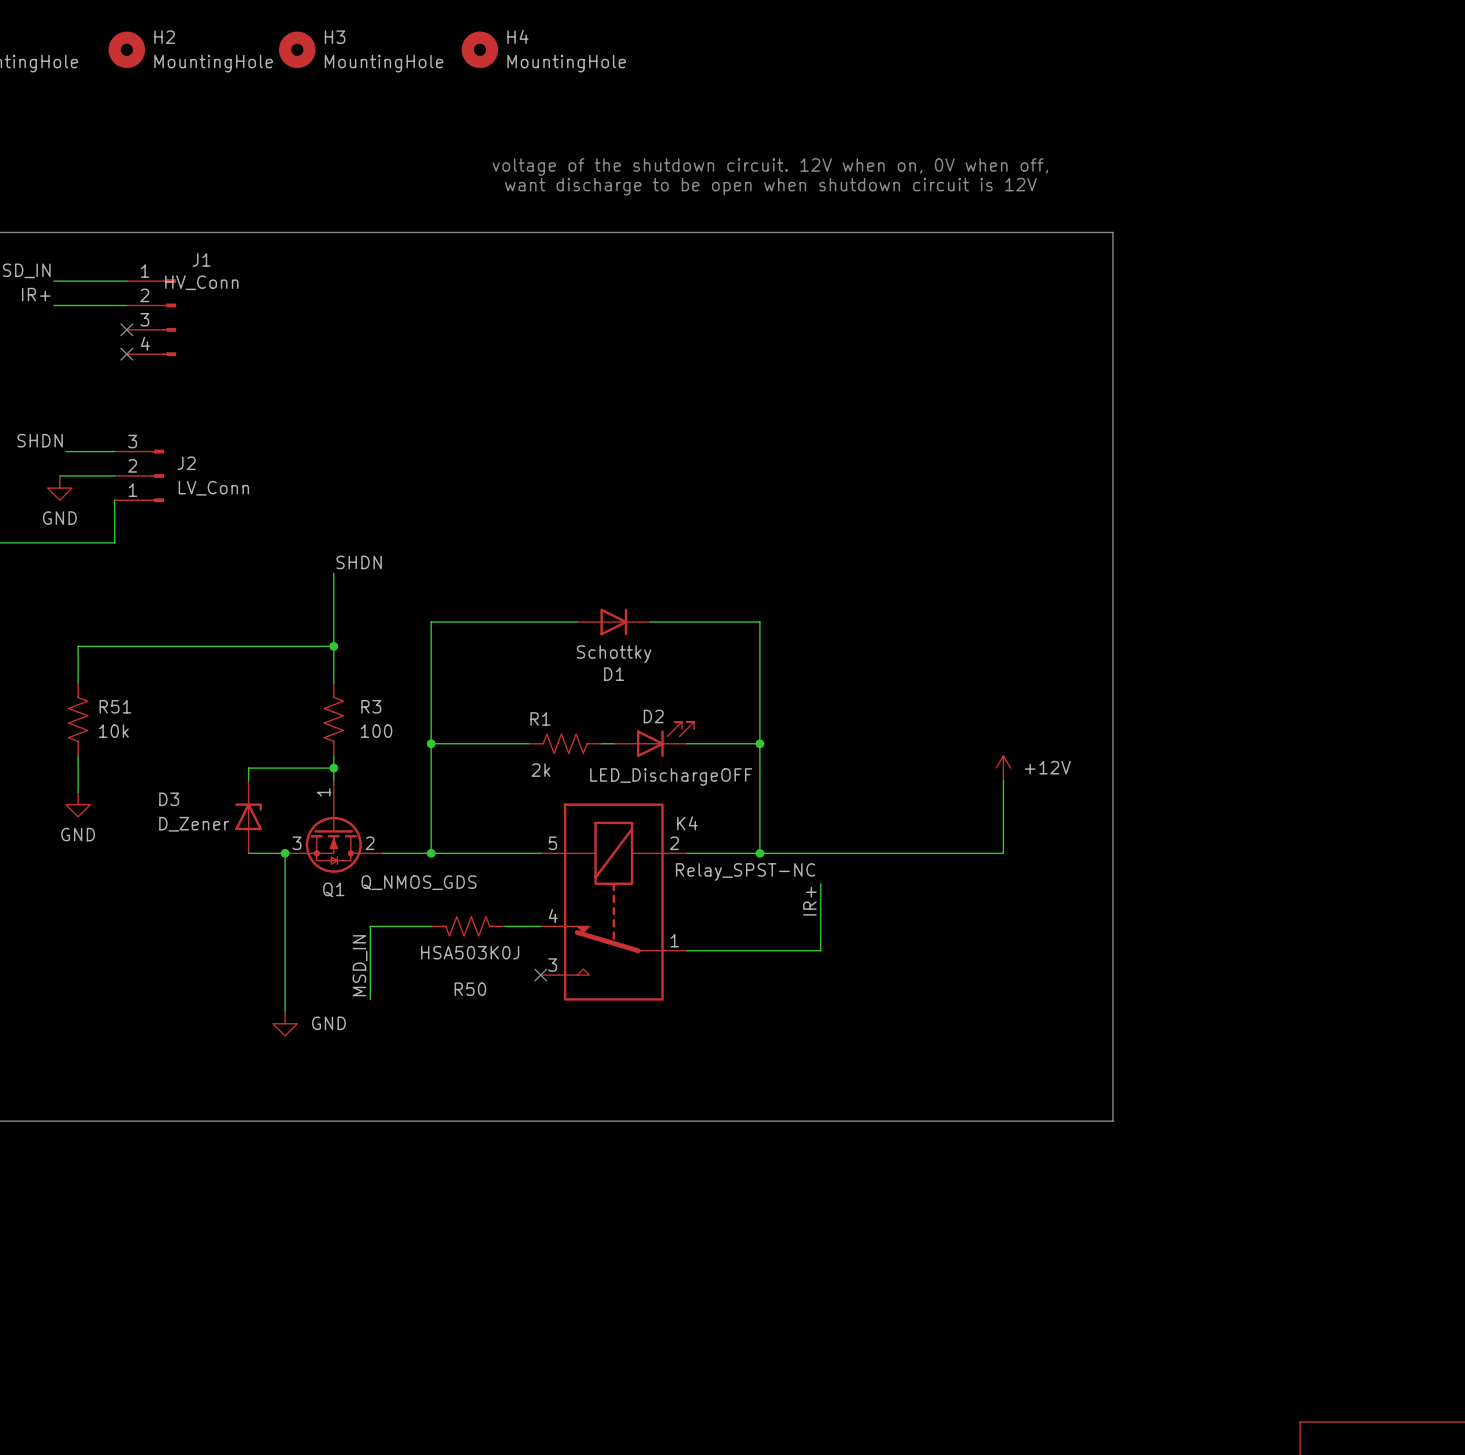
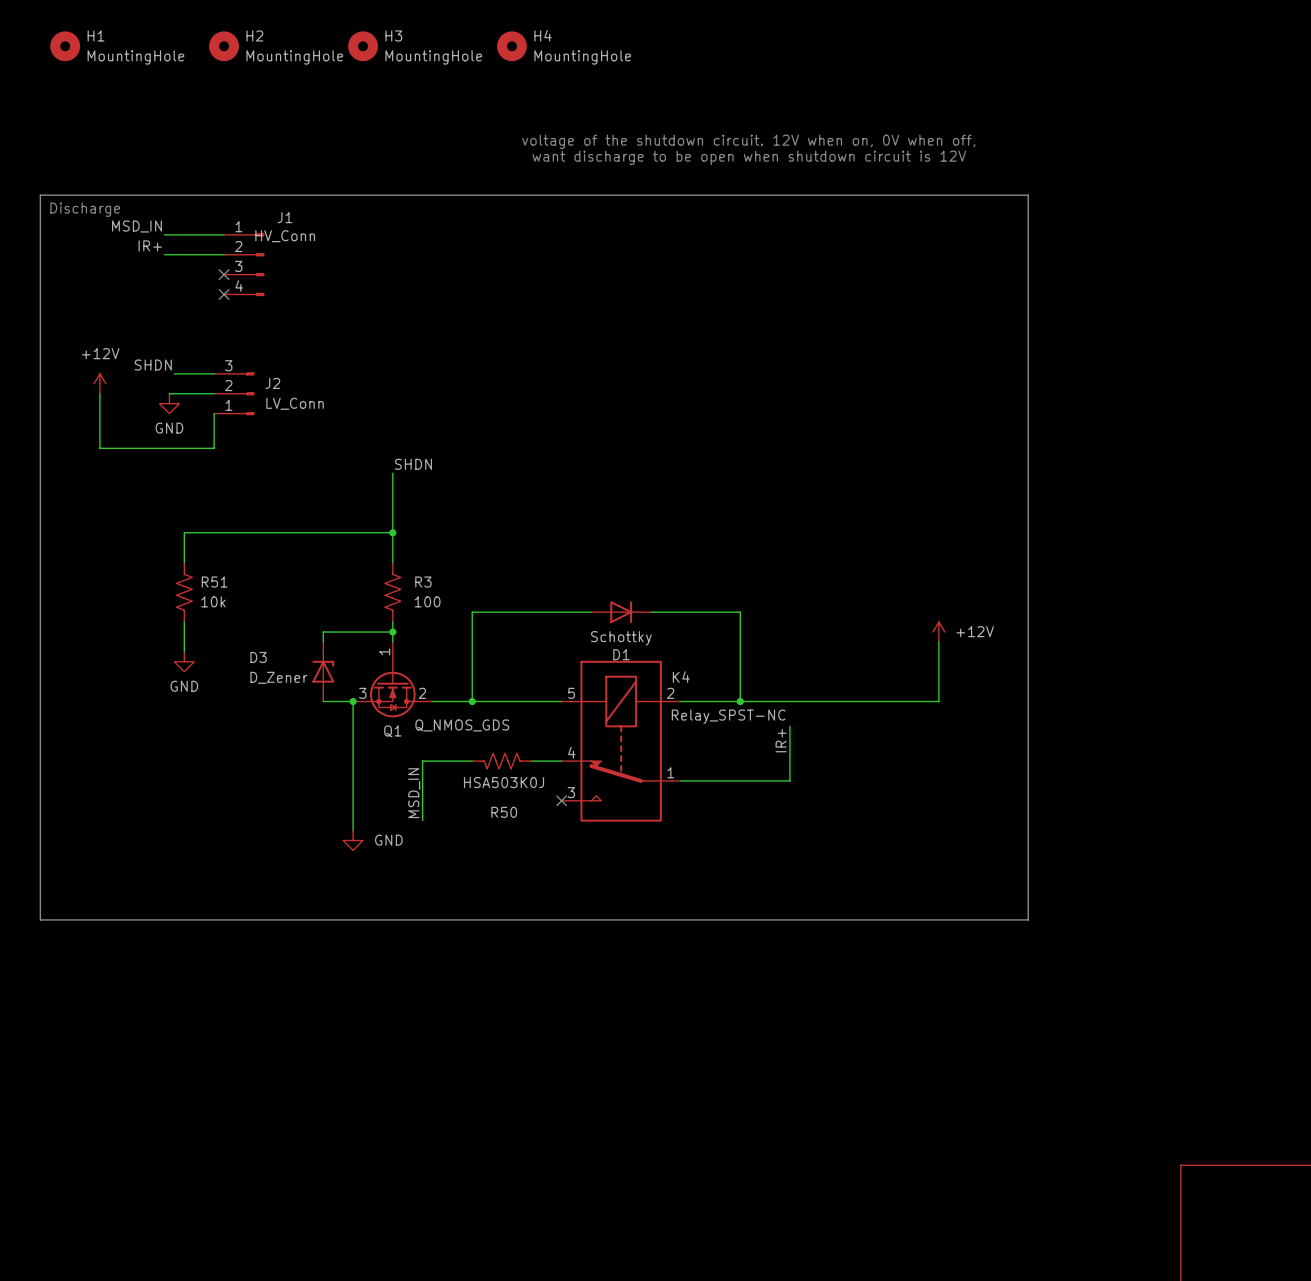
wire: (577, 622) (431, 622) (431, 743) -> none
D1 position: (613, 622) -> (621, 612)
wire: (650, 622) (759, 622) (759, 743) -> none
D2: LED_DischargeOFF (653, 739) -> none
junction: (431, 743) -> none
wire: none -> (551, 612) (591, 612)
R1: 2k (565, 743) -> none
junction: (759, 743) -> none

